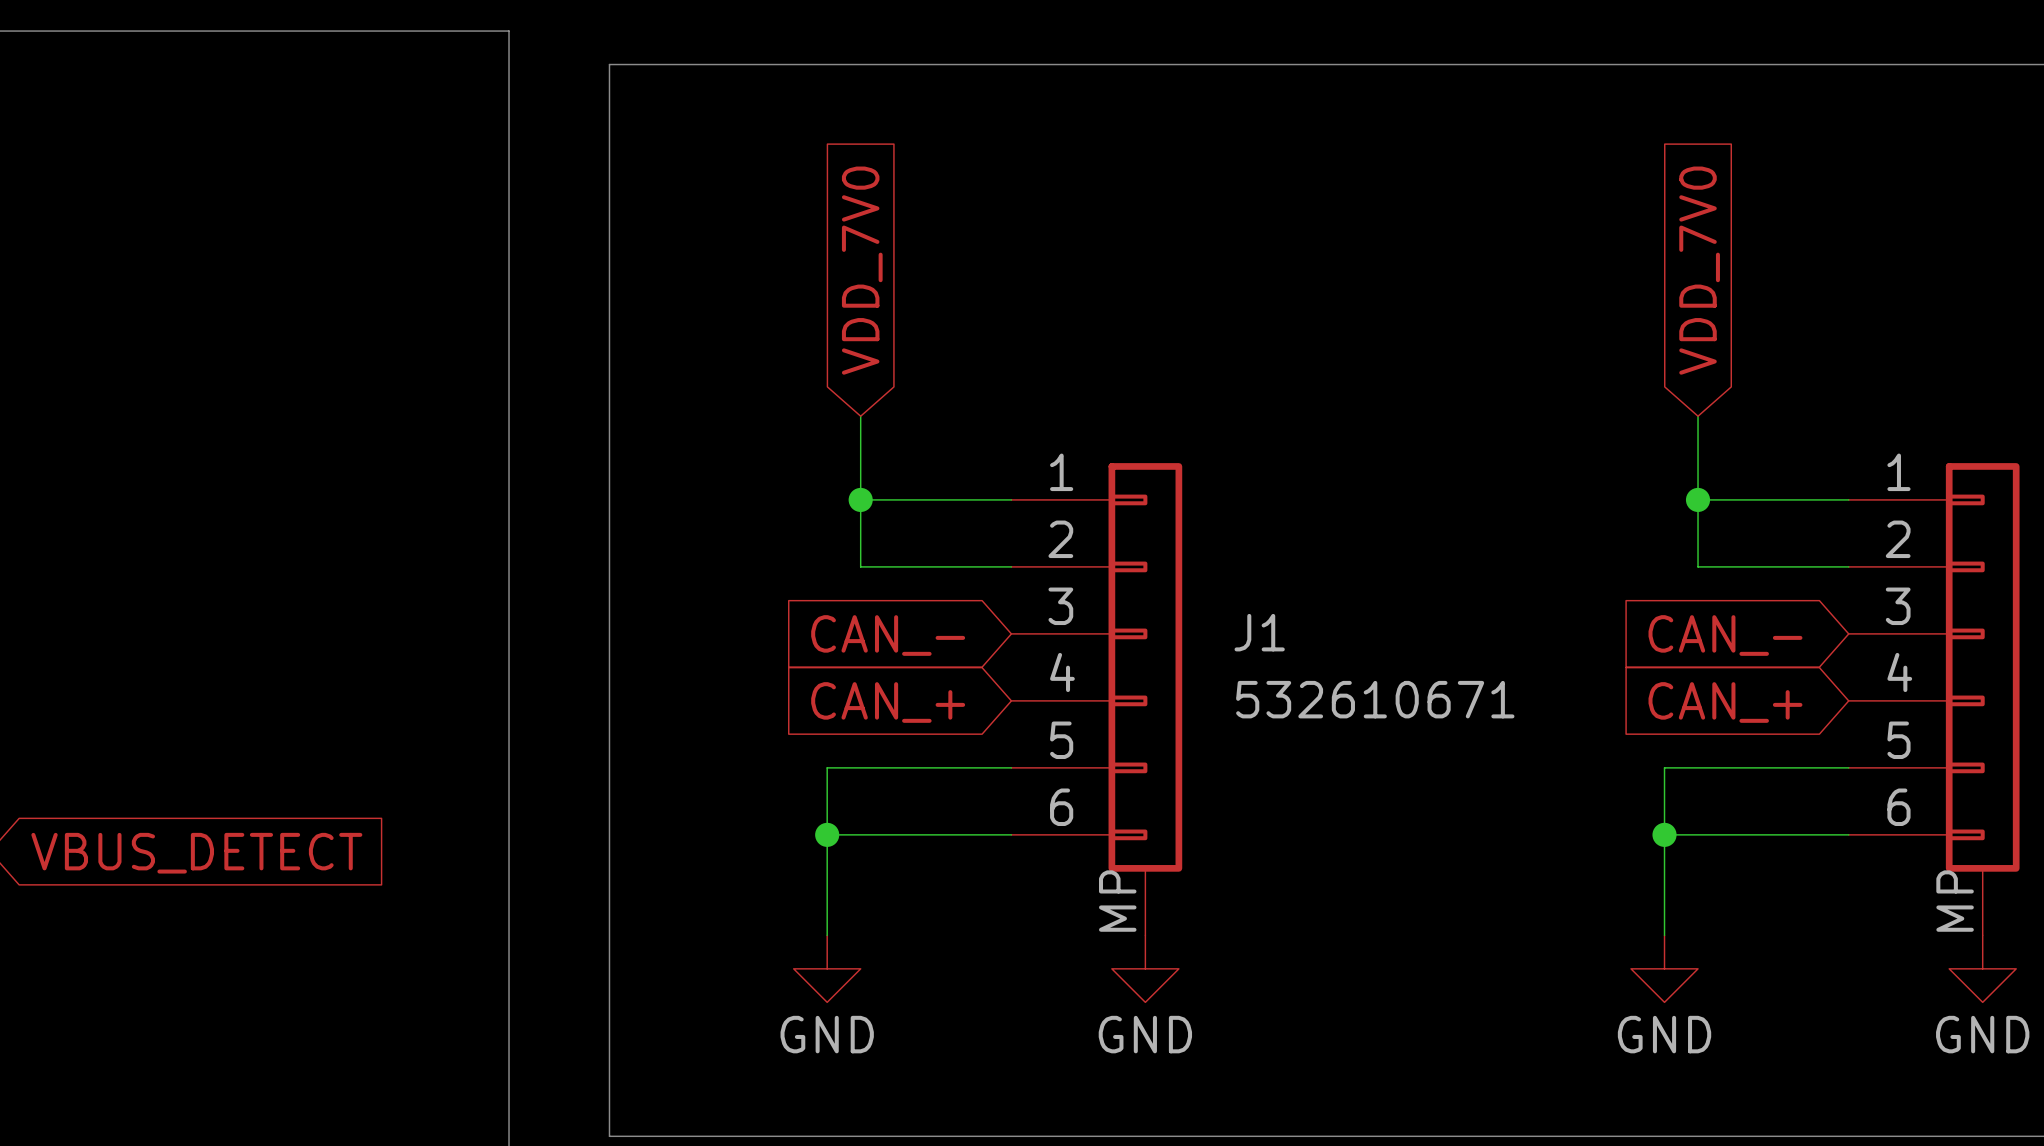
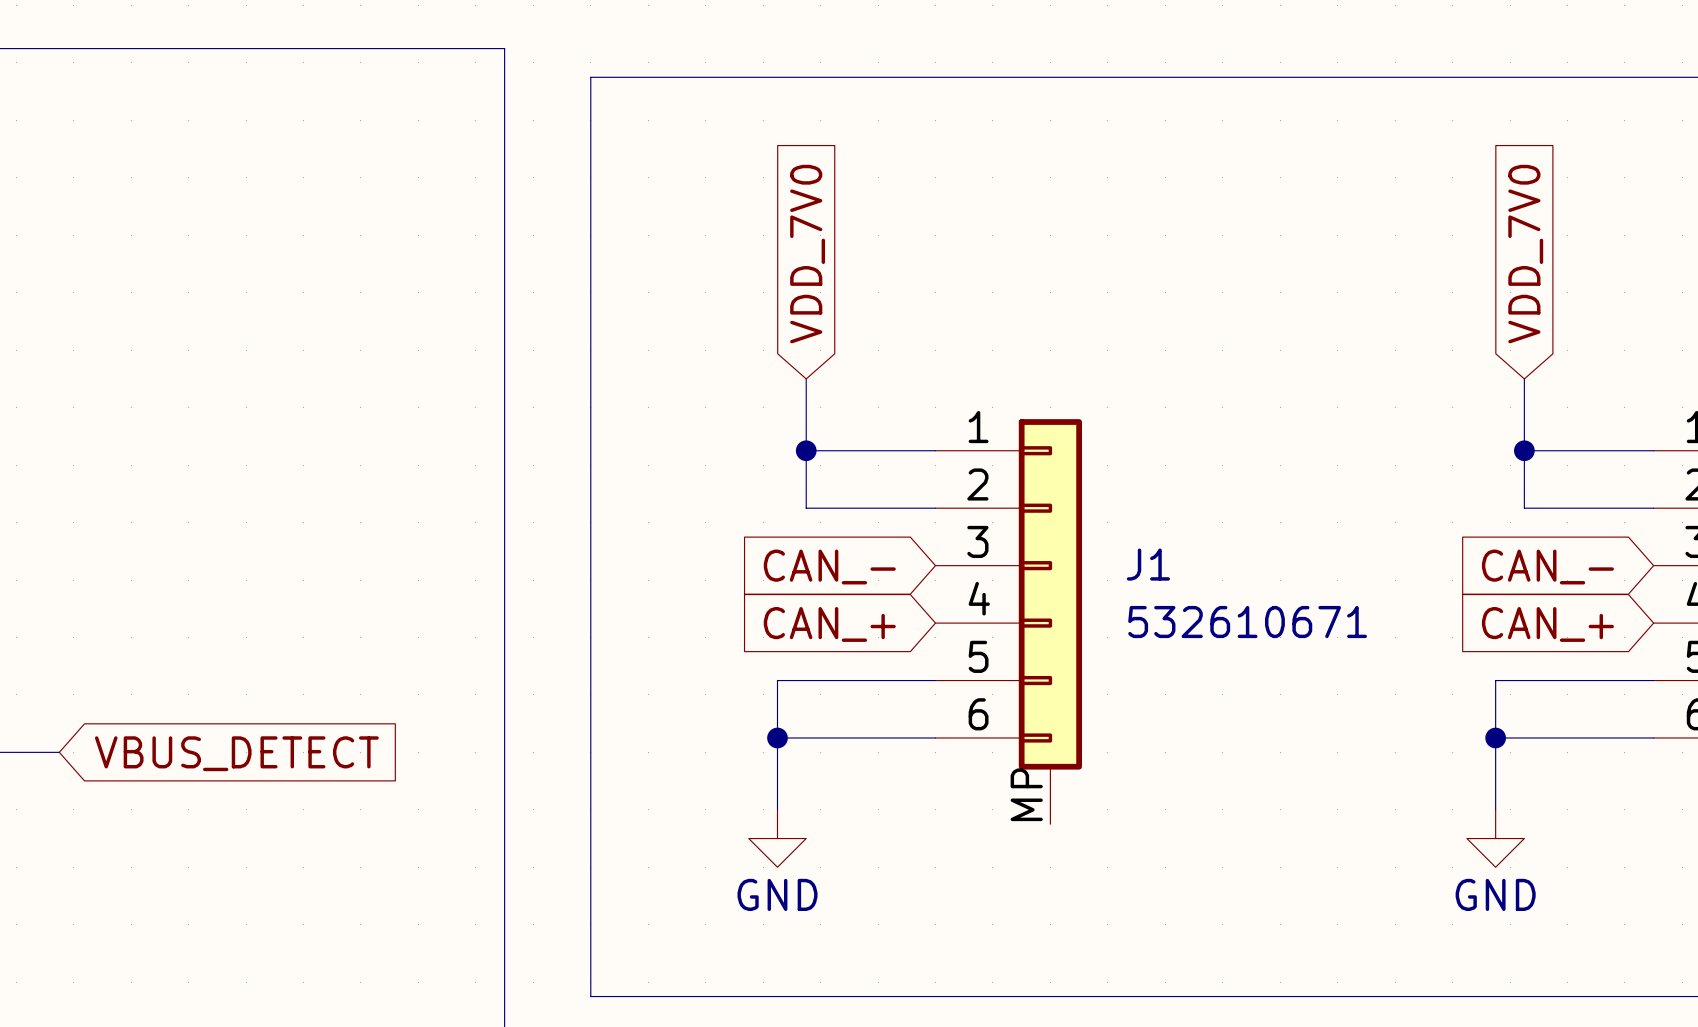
power symbol position: GND (827, 968) -> GND (777, 838)
power symbol: GND (1145, 968) -> none
power symbol position: GND (1664, 968) -> GND (1495, 838)

